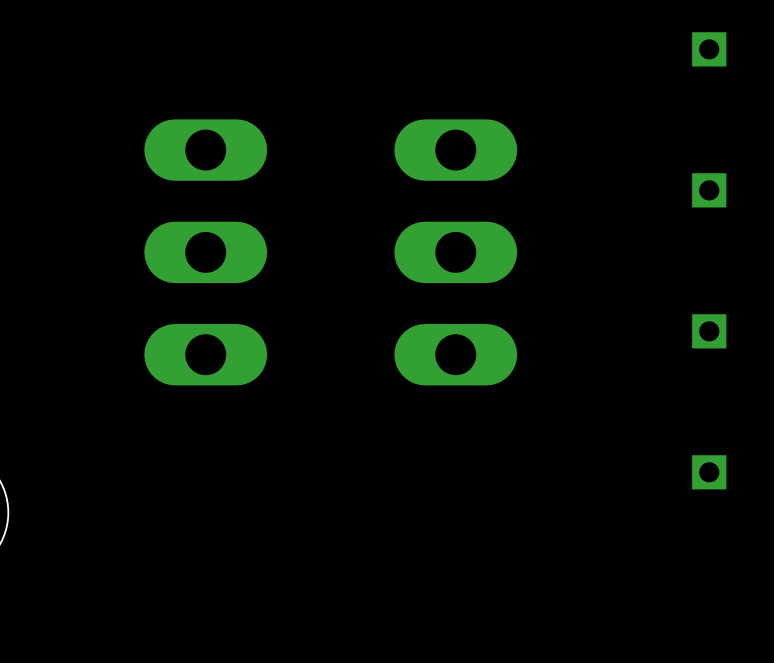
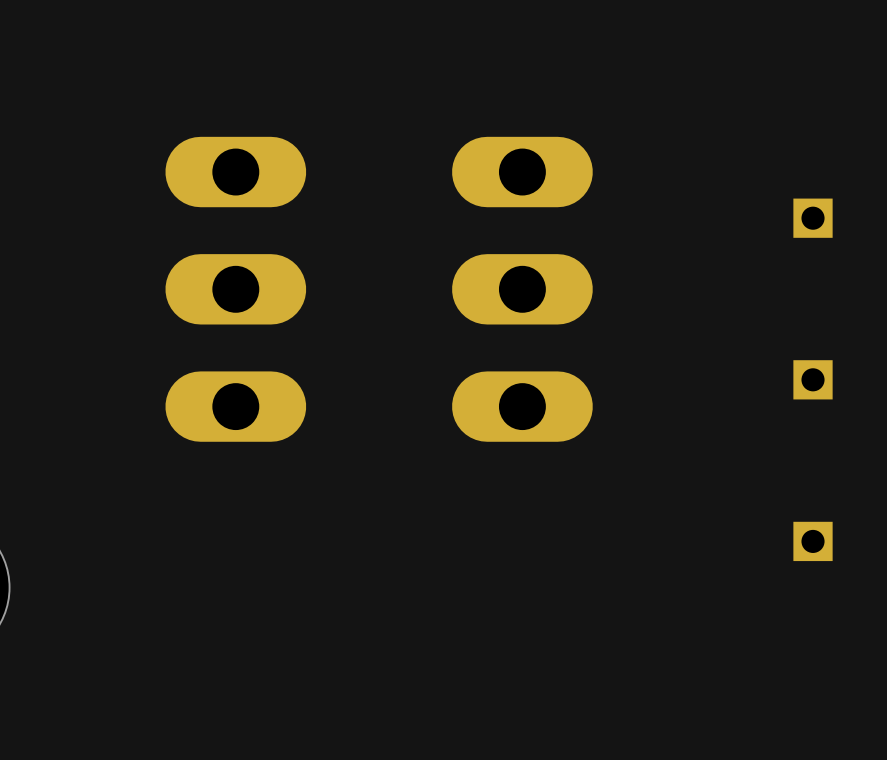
part: (709, 49) -> none

